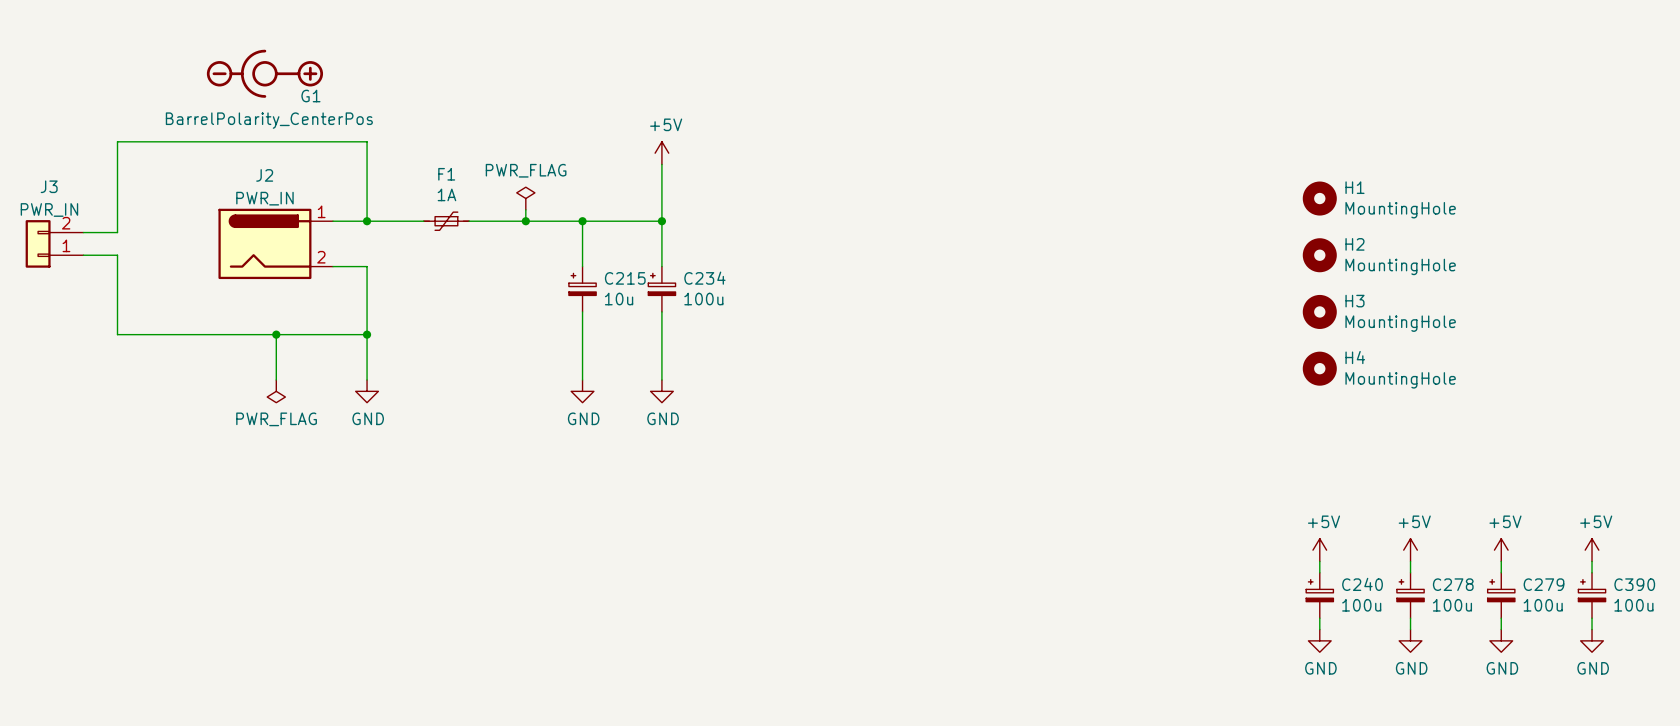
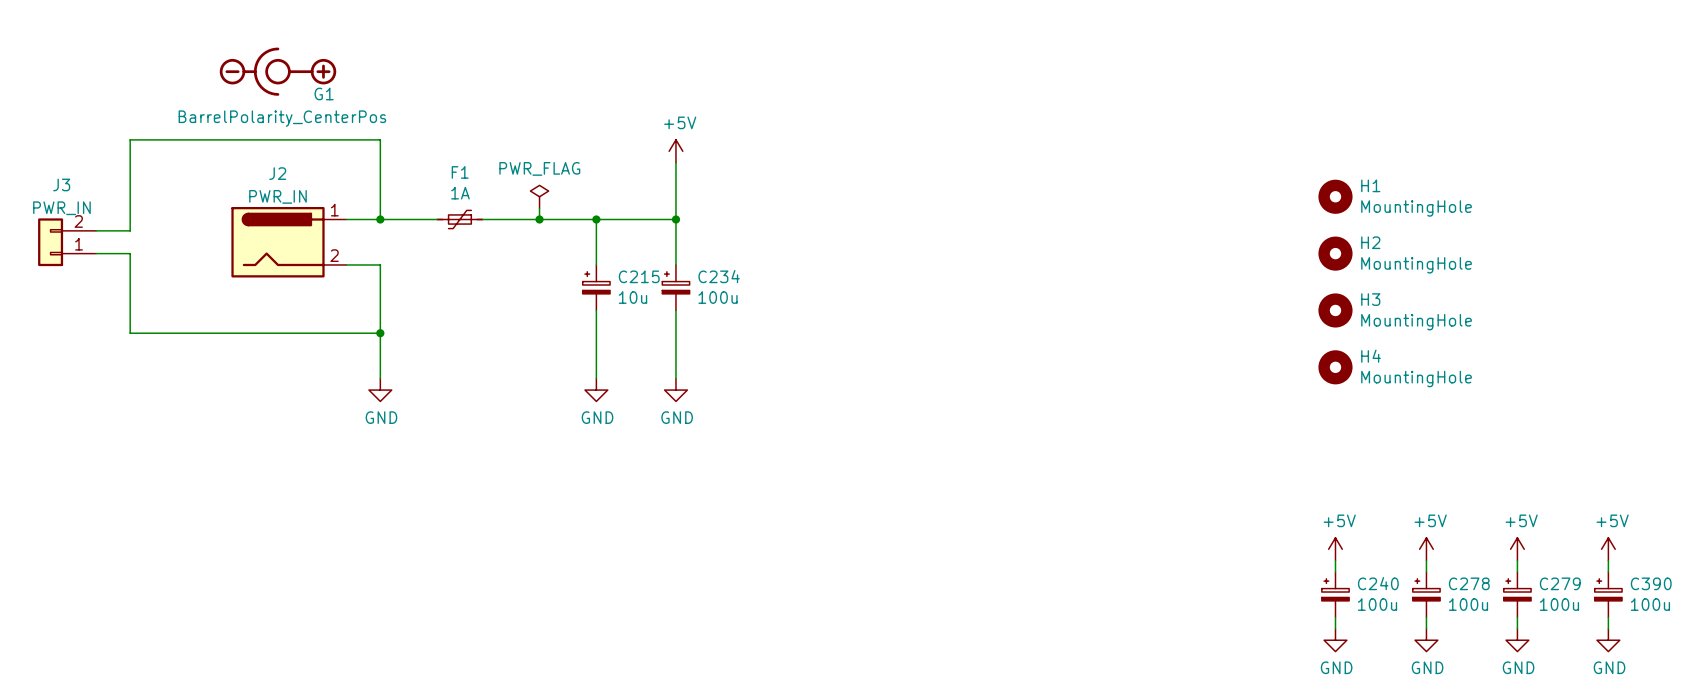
wire: (276, 334) (276, 380) -> none
junction: (276, 334) -> none
power symbol: PWR_FLAG (276, 391) -> none

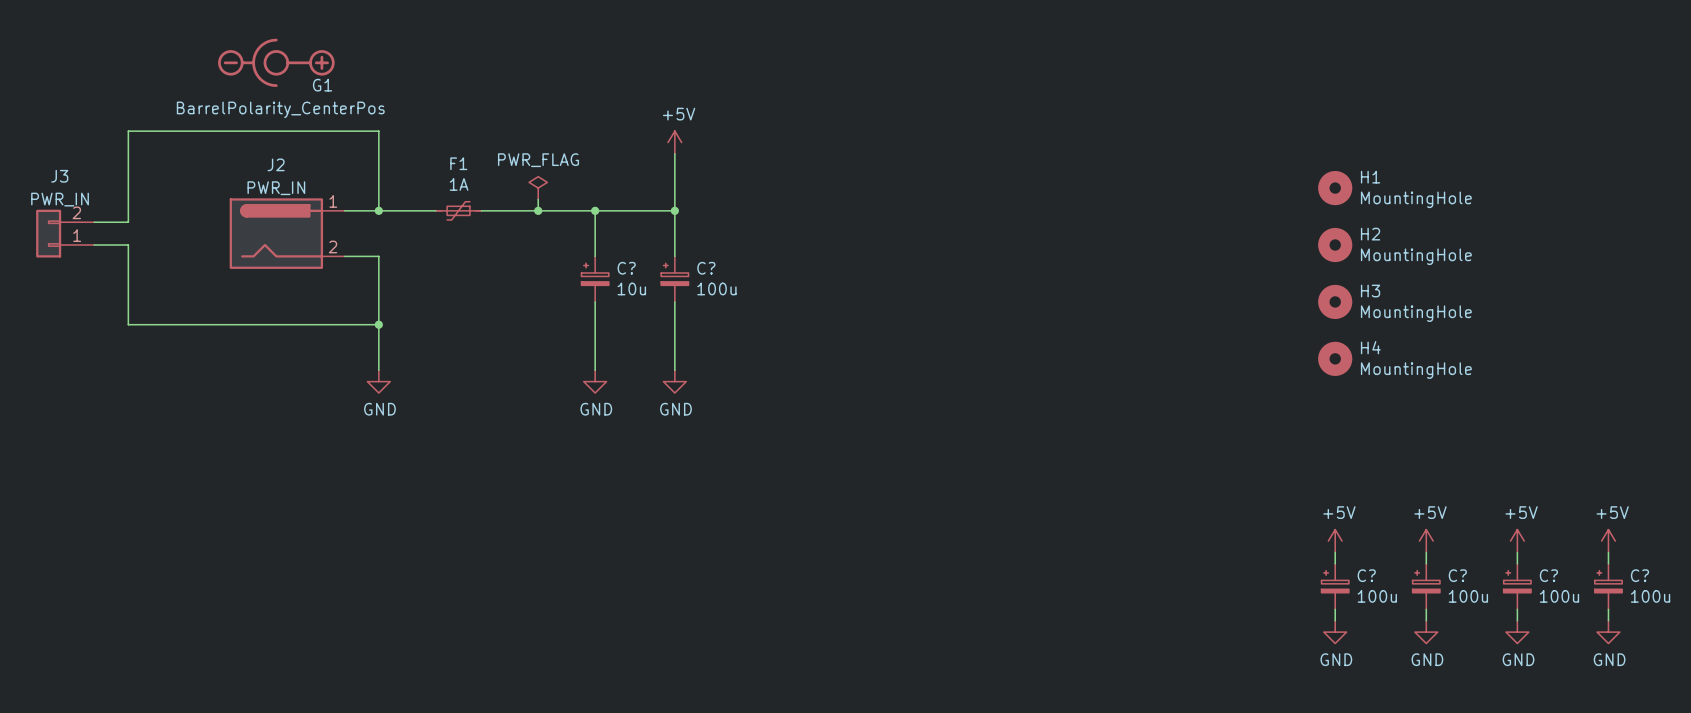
C215 name: C215 (639, 276) -> C? (626, 268)
C234 name: C234 (719, 276) -> C? (706, 268)
C240 name: C240 (1378, 583) -> C? (1366, 575)
C278 name: C278 (1469, 583) -> C? (1457, 575)
C279 name: C279 (1560, 583) -> C? (1548, 575)
C390 name: C390 (1651, 583) -> C? (1639, 575)

